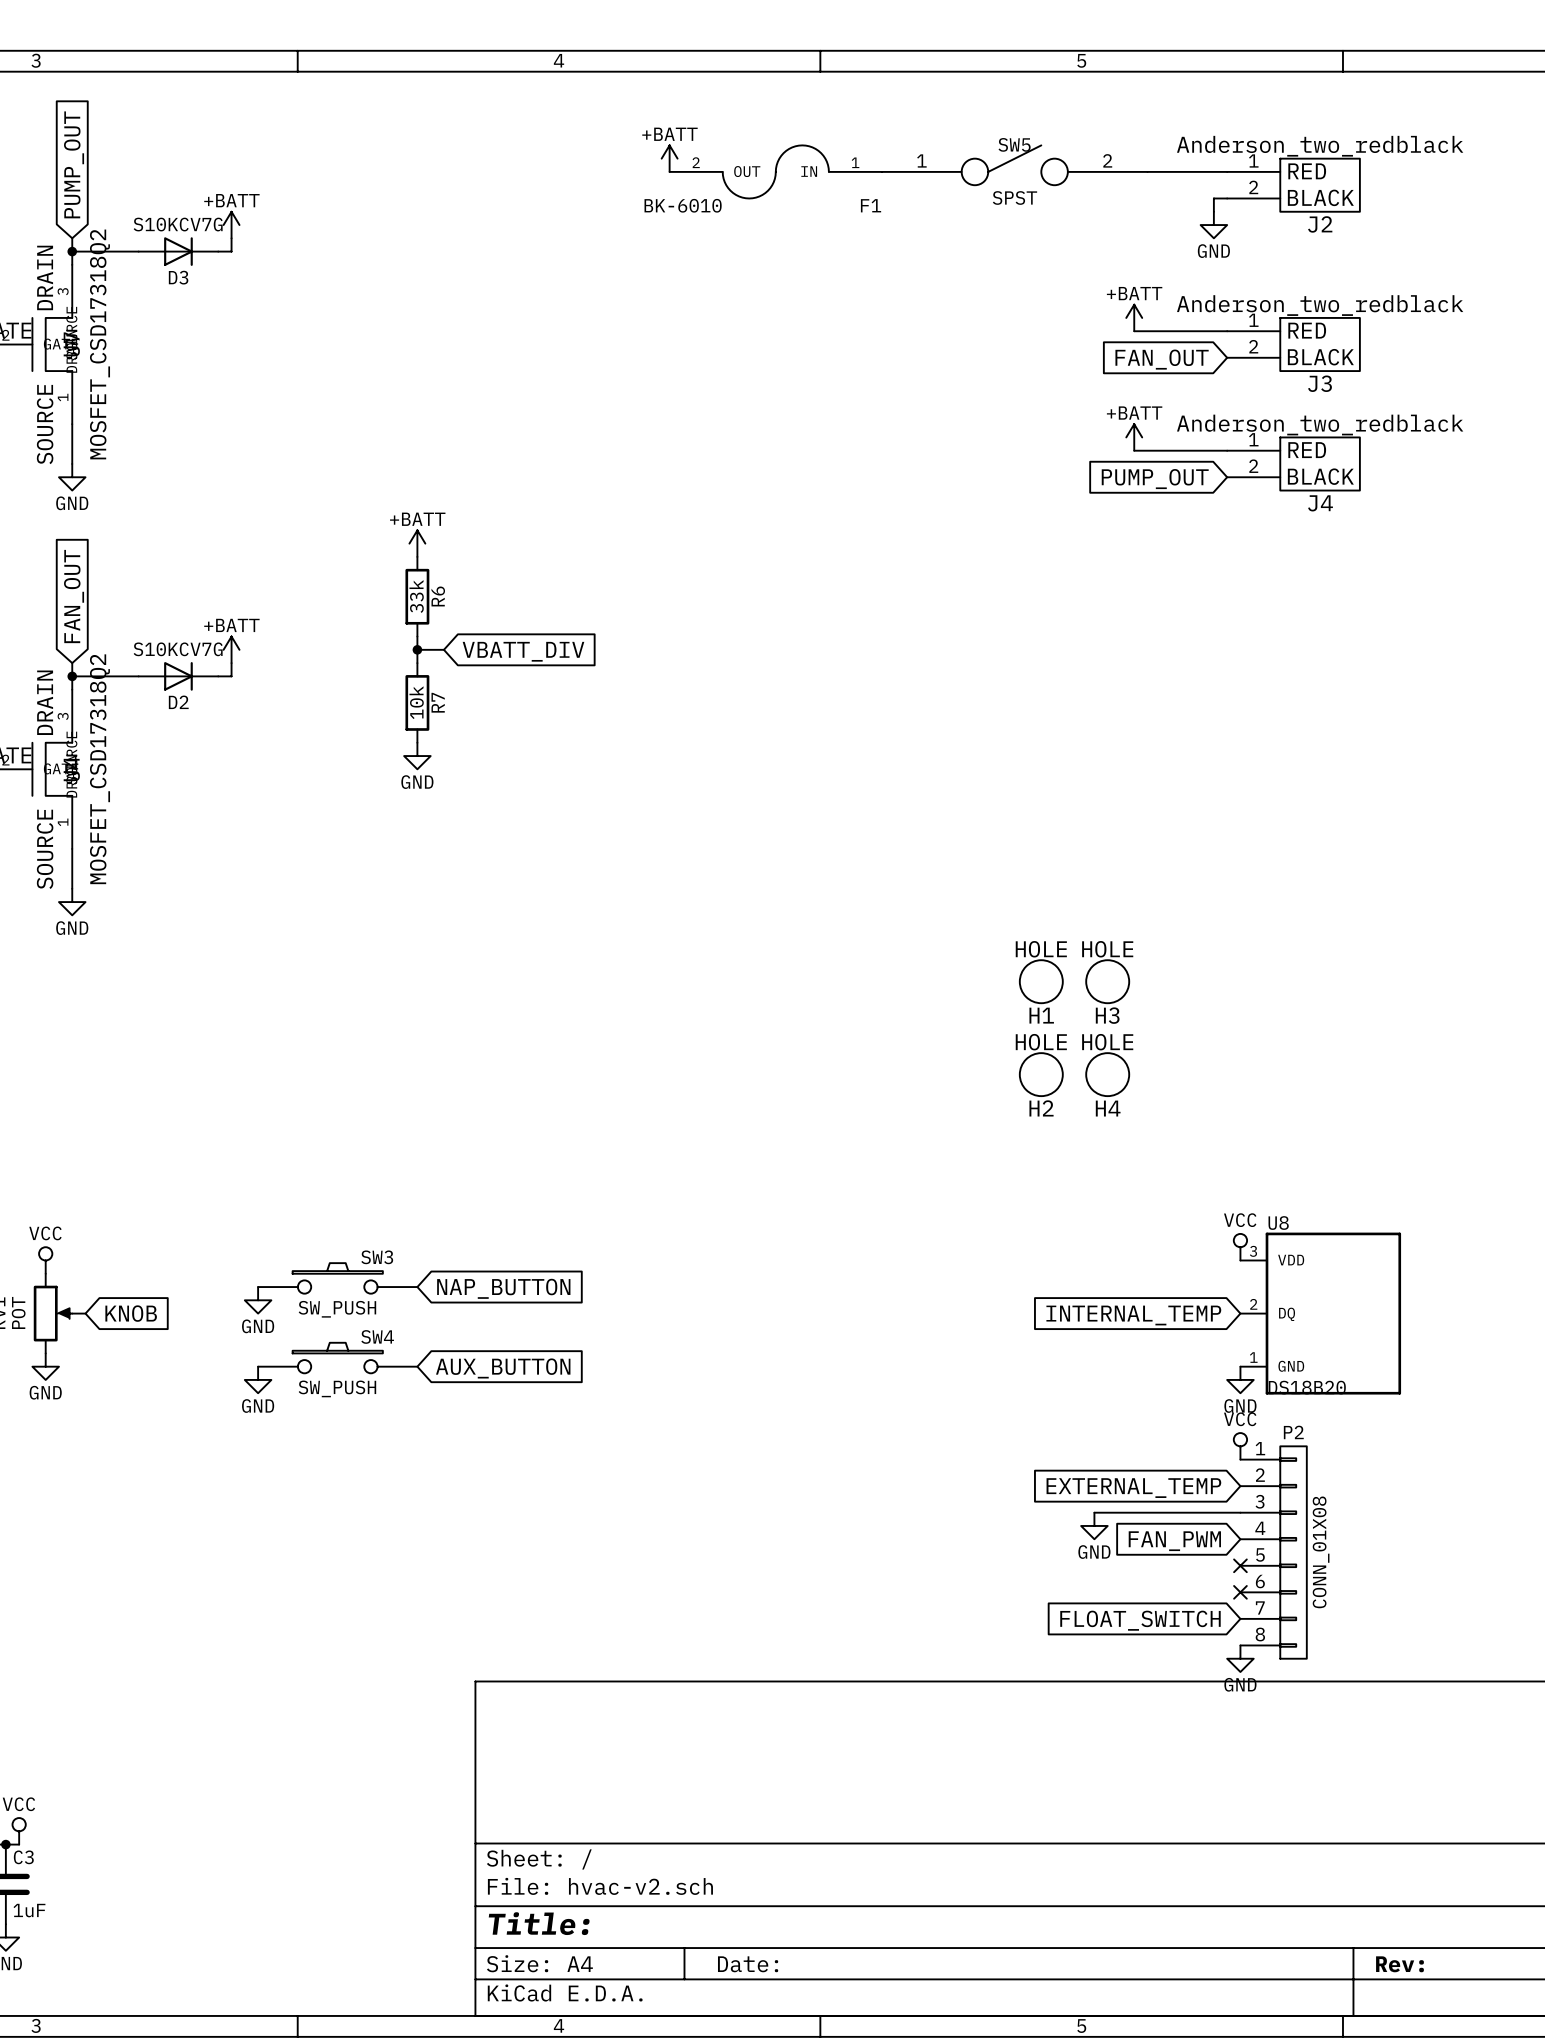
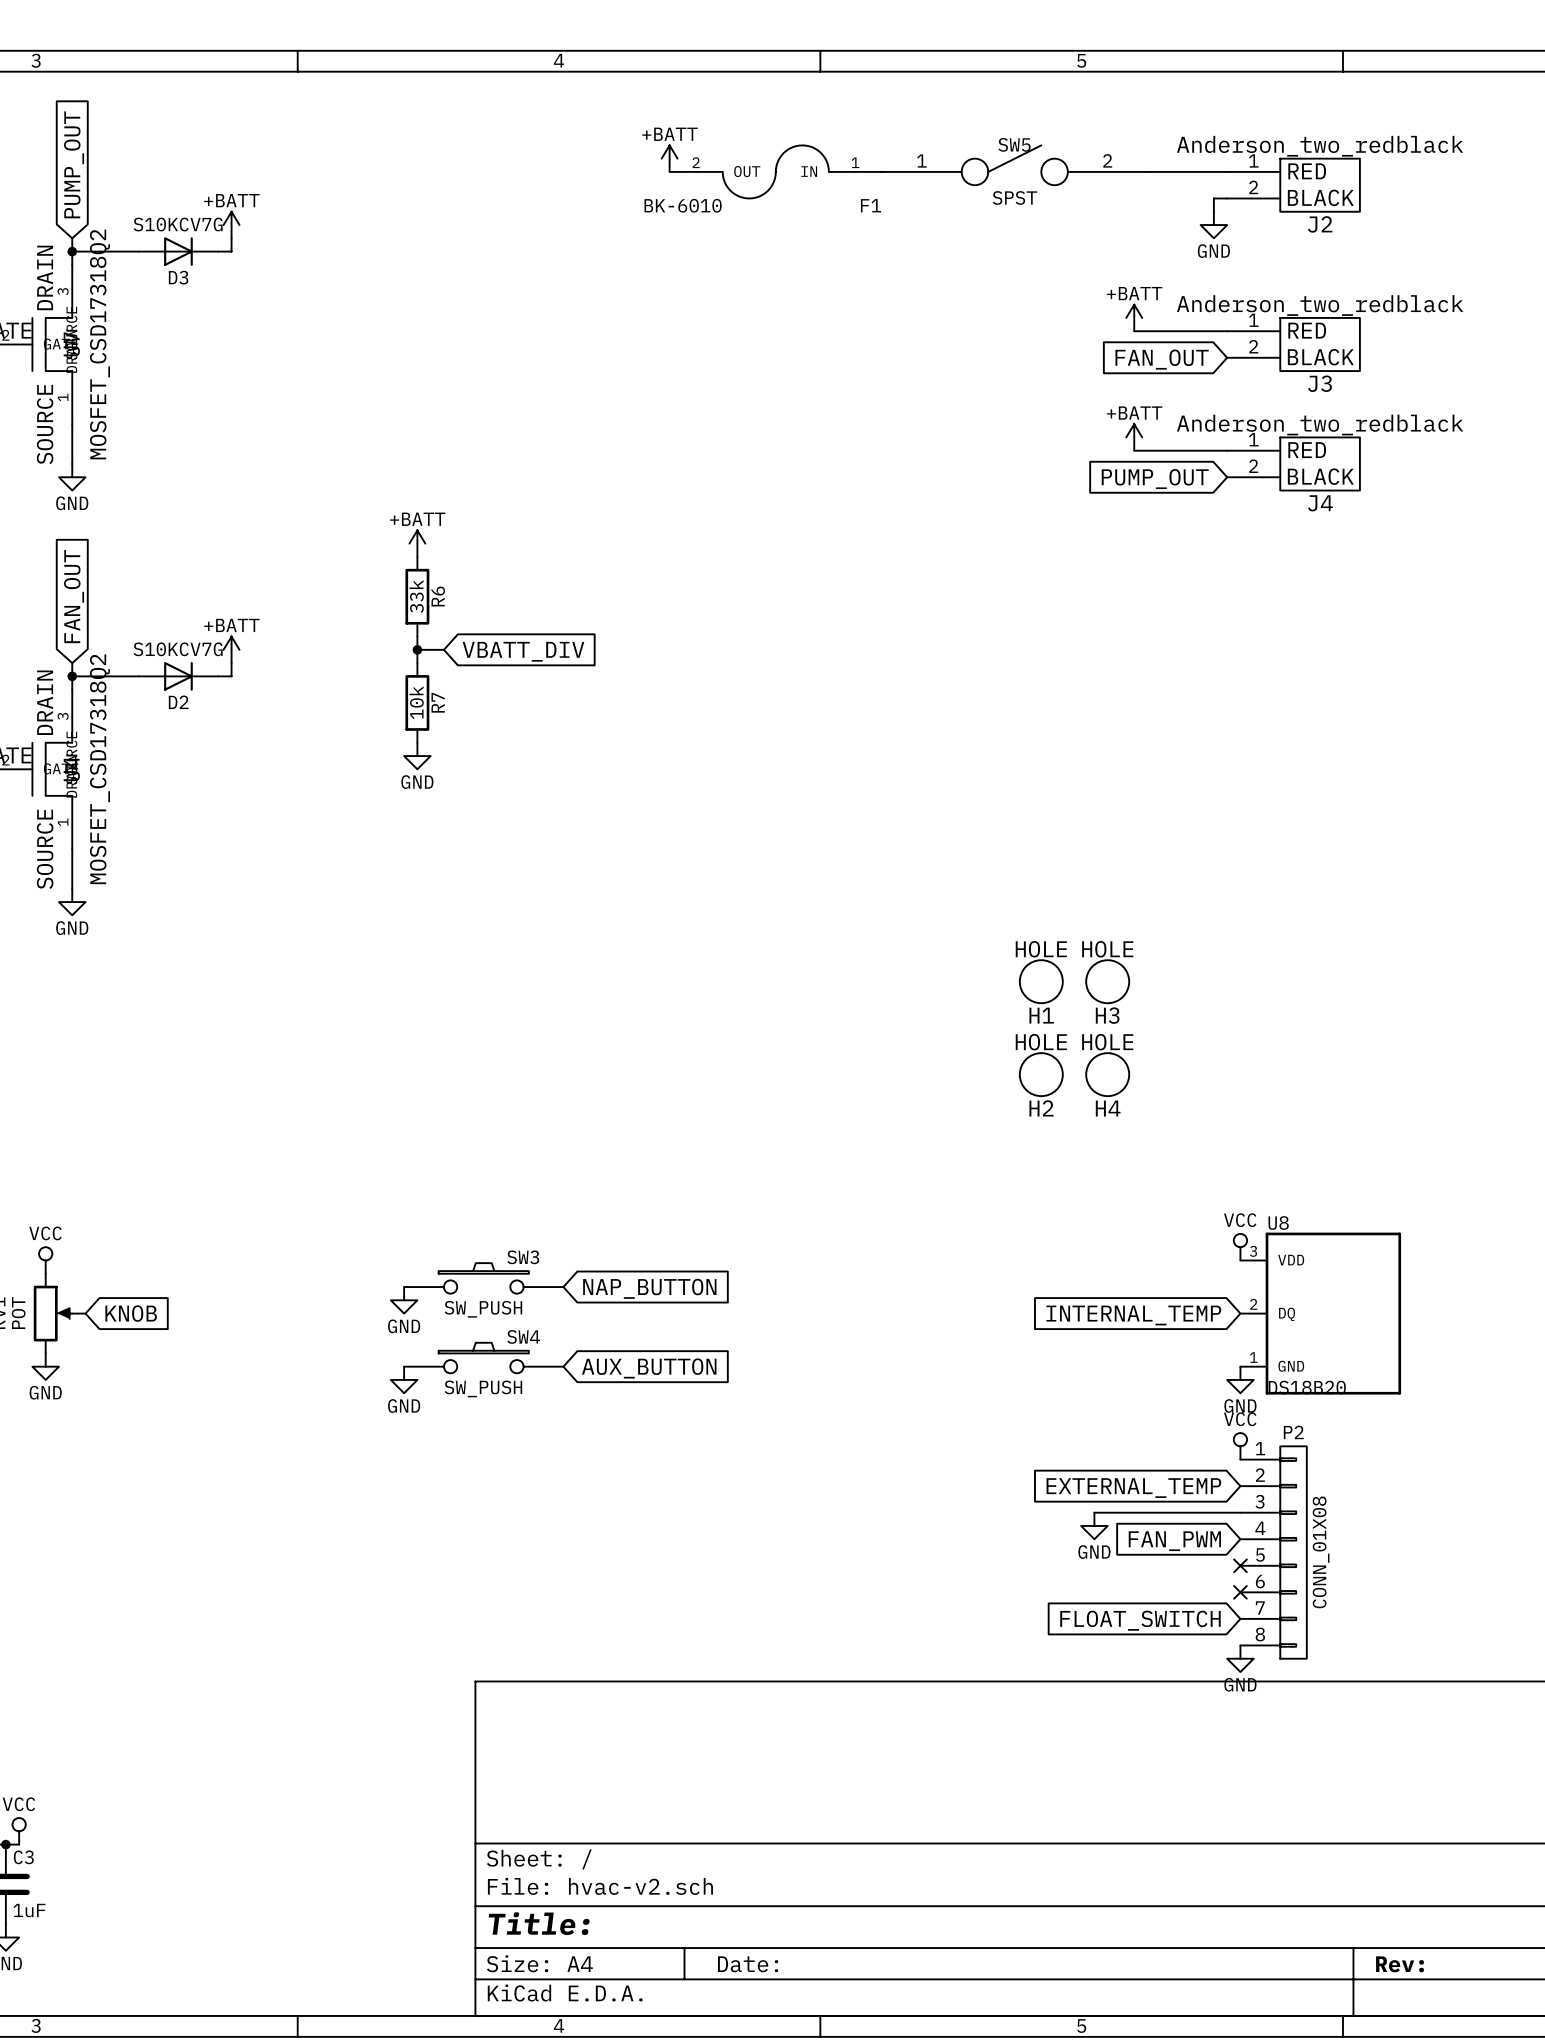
SW3 position: (337, 1278) -> (483, 1278)
global label position: NAP_BUTTON (503, 1288) -> NAP_BUTTON (649, 1288)
power symbol: GND (258, 1300) -> none
power symbol: none -> GND (404, 1300)
SW4 position: (337, 1358) -> (483, 1358)
global label position: AUX_BUTTON (503, 1368) -> AUX_BUTTON (649, 1368)
power symbol: GND (258, 1379) -> none
power symbol: none -> GND (404, 1379)

